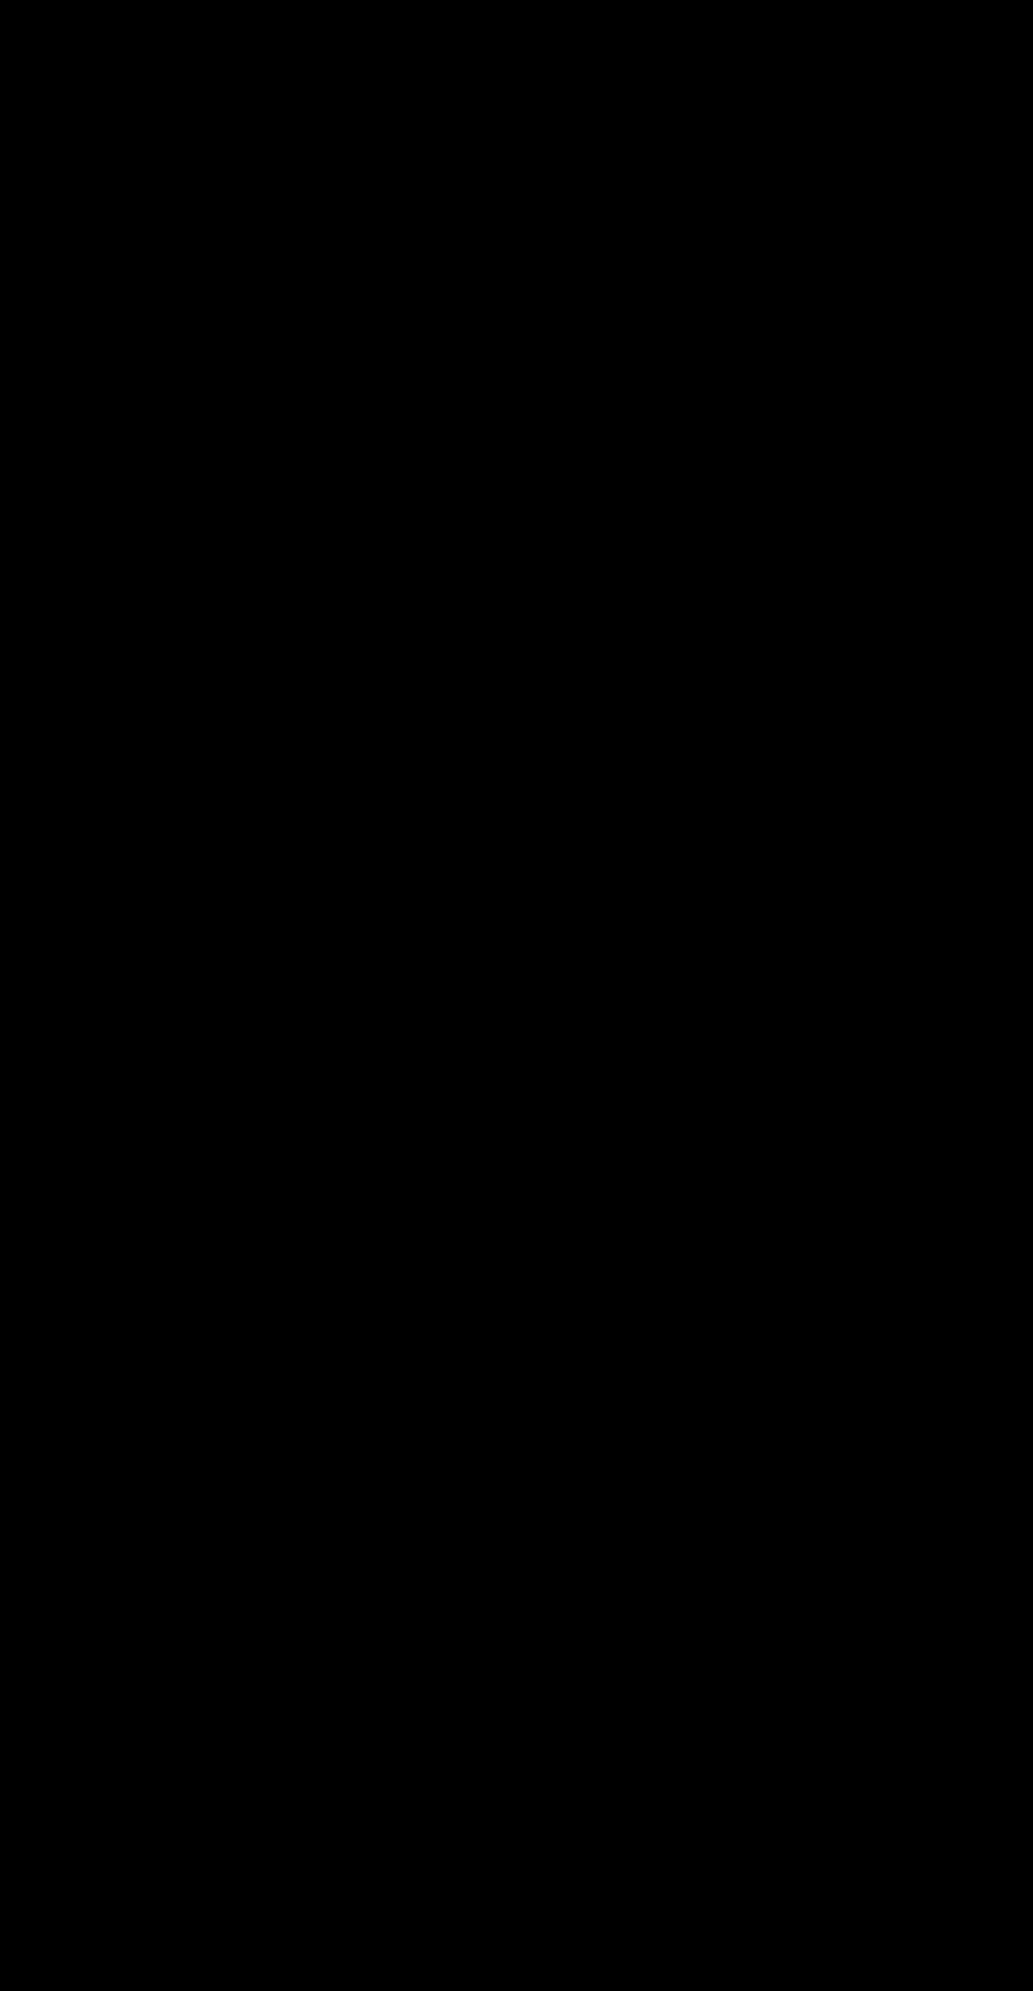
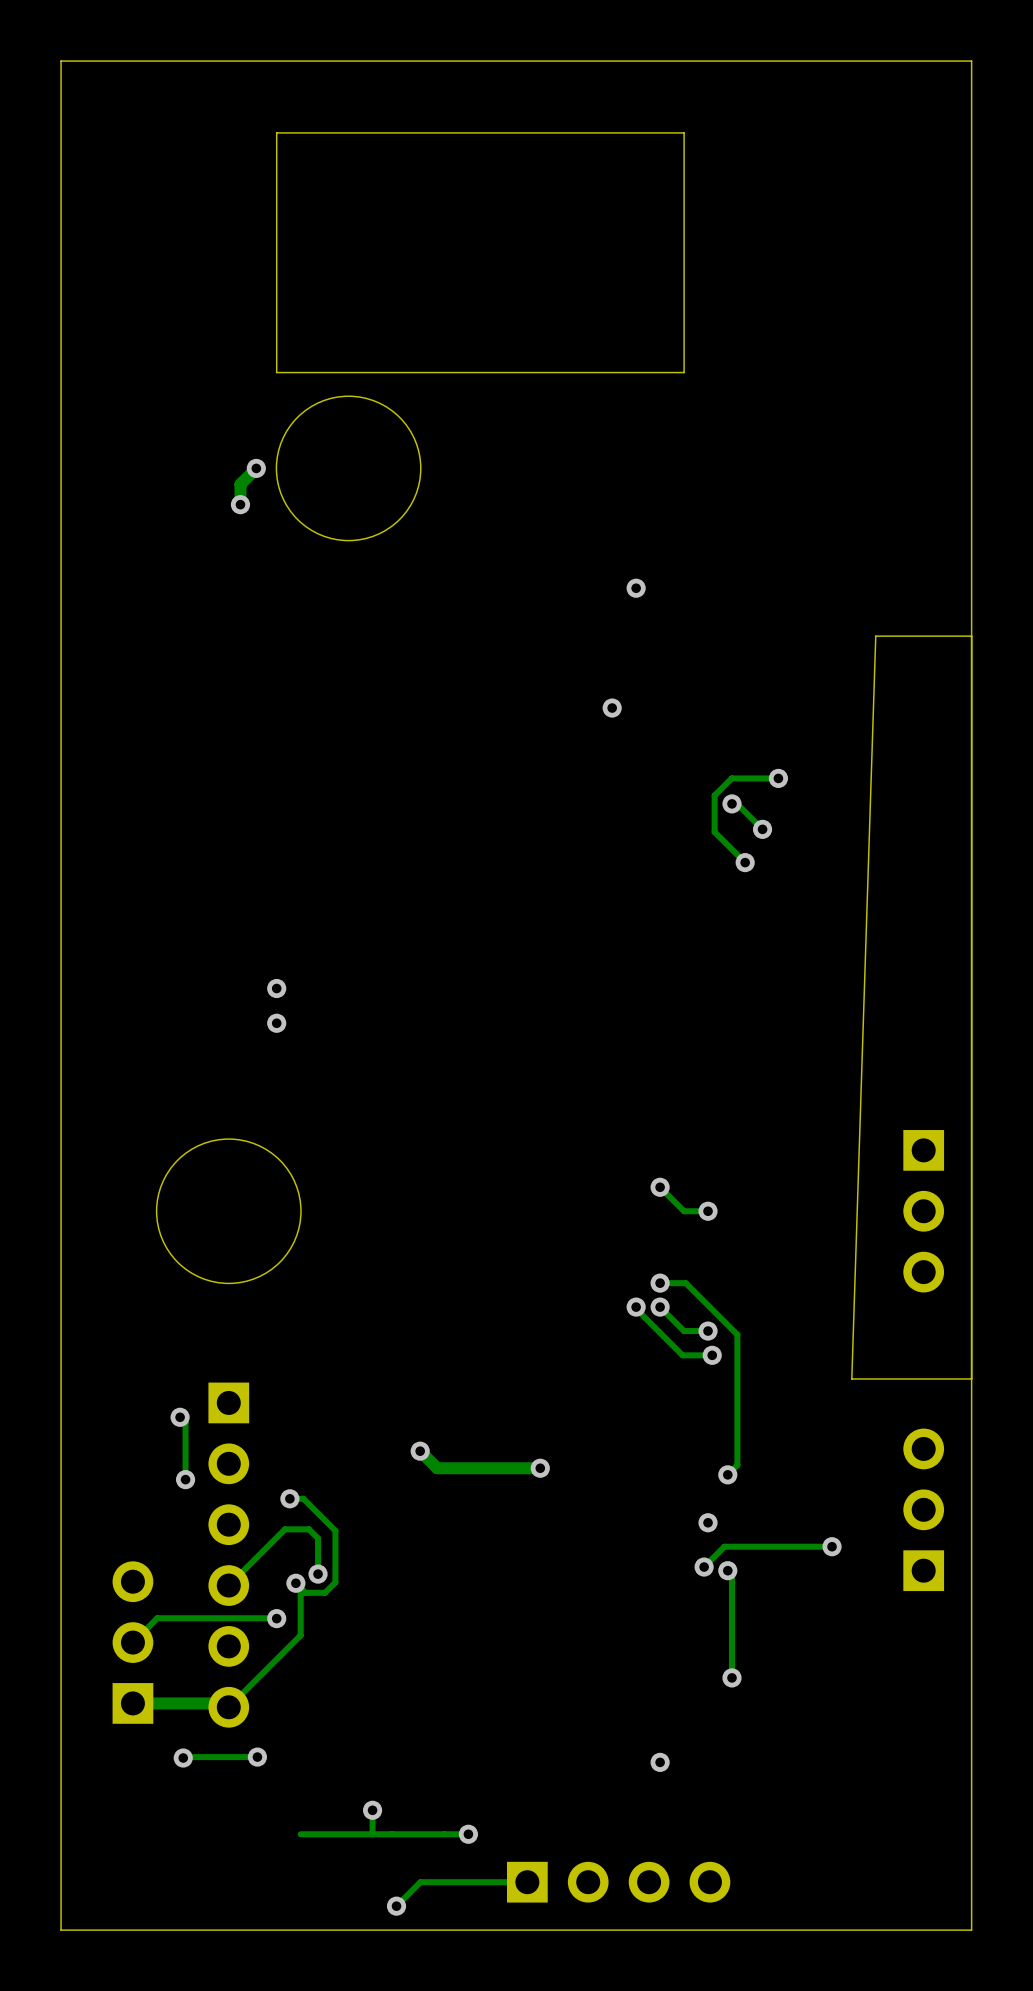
board edge: none -> (971, 61) (971, 1930) (61, 1930) (61, 61) (971, 61)
board edge: none -> (684, 132) (276, 132) (276, 372) (684, 372) (684, 132)
round board edge: none -> [275, 395, 422, 542]
track: none -> (256, 468) (240, 484) (240, 504)
via: none -> (256, 468)
via: none -> (240, 504)
via: none -> (636, 588)
board edge: none -> (971, 636) (875, 636) (851, 1378) (971, 1378)
via: none -> (612, 708)
track: none -> (778, 778) (731, 778) (714, 795) (714, 832) (745, 862)
via: none -> (778, 778)
track: none -> (732, 803) (737, 803) (762, 829)
via: none -> (732, 803)
via: none -> (762, 829)
via: none -> (745, 862)
via: none -> (276, 988)
via: none -> (276, 1023)
round board edge: none -> [156, 1138, 302, 1285]
track: none -> (660, 1187) (684, 1211) (708, 1211)
via: none -> (660, 1187)
via: none -> (708, 1211)
part: none -> (923, 1211)
track: none -> (660, 1283) (685, 1283) (737, 1334) (737, 1465) (727, 1474)
via: none -> (660, 1283)
track: none -> (636, 1307) (682, 1355) (712, 1355)
via: none -> (636, 1307)
track: none -> (660, 1307) (684, 1331) (708, 1331)
via: none -> (660, 1307)
via: none -> (708, 1331)
via: none -> (712, 1355)
track: none -> (180, 1417) (185, 1422) (185, 1479)
via: none -> (180, 1417)
track: none -> (420, 1451) (437, 1468) (540, 1468)
via: none -> (420, 1451)
via: none -> (540, 1468)
via: none -> (727, 1474)
via: none -> (185, 1479)
track: none -> (289, 1498) (303, 1498) (335, 1530) (335, 1582) (325, 1592) (305, 1592) (295, 1583) (300, 1583) (300, 1635) (228, 1707) (224, 1703) (132, 1703)
via: none -> (289, 1498)
part: none -> (923, 1509)
via: none -> (708, 1522)
track: none -> (832, 1546) (724, 1546) (704, 1567)
via: none -> (832, 1546)
part: none -> (228, 1555)
via: none -> (704, 1567)
track: none -> (727, 1570) (732, 1574) (732, 1677)
via: none -> (727, 1570)
track: none -> (318, 1574) (318, 1538) (309, 1529) (284, 1529) (228, 1585)
via: none -> (318, 1574)
via: none -> (295, 1583)
track: none -> (276, 1618) (157, 1618) (132, 1642)
via: none -> (276, 1618)
part: none -> (132, 1642)
via: none -> (732, 1677)
track: none -> (257, 1757) (183, 1758)
via: none -> (257, 1757)
via: none -> (183, 1758)
via: none -> (660, 1762)
track: none -> (372, 1810) (372, 1834)
via: none -> (372, 1810)
track: none -> (468, 1834) (300, 1834)
via: none -> (468, 1834)
track: none -> (527, 1882) (420, 1882) (396, 1906)
part: none -> (618, 1882)
via: none -> (396, 1906)

